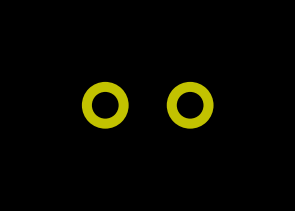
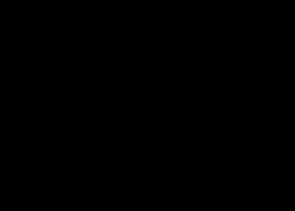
part: (147, 105) -> none

